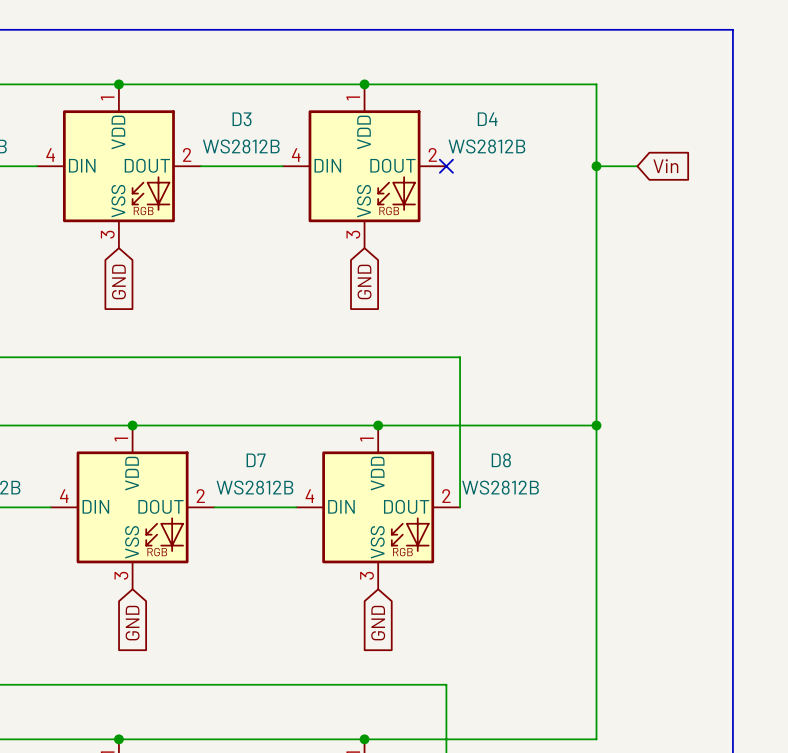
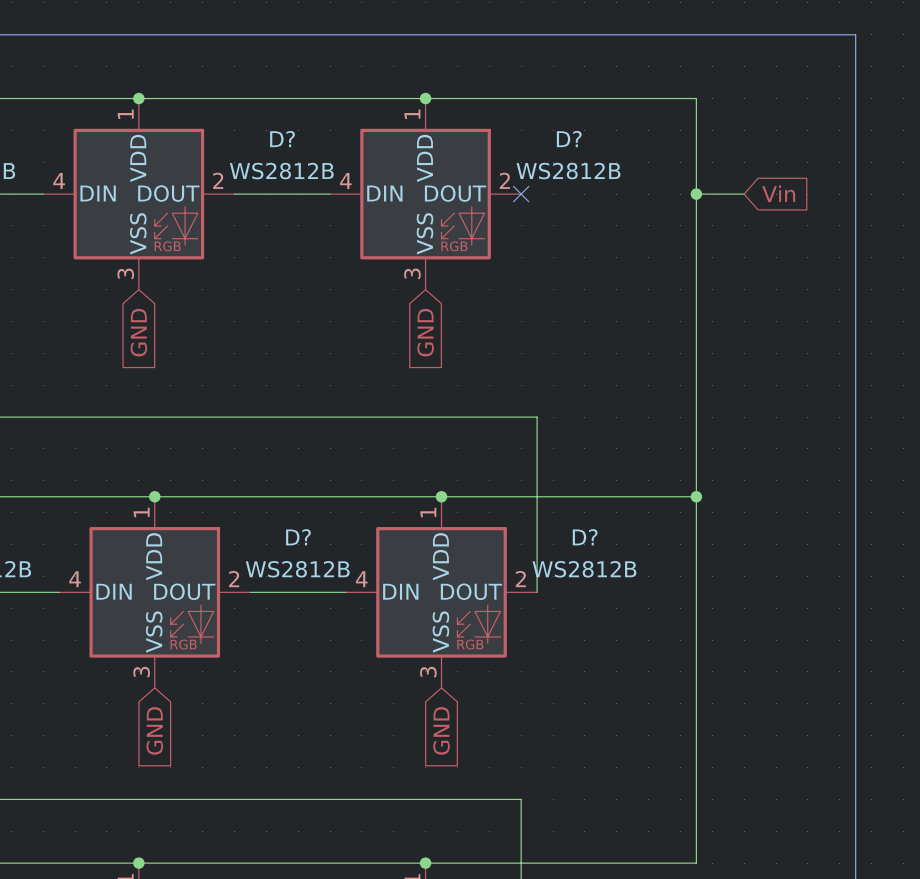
D3 name: D3 (242, 119) -> D? (282, 139)
D4 name: D4 (487, 119) -> D? (569, 139)
D7 name: D7 (256, 460) -> D? (298, 537)
D8 name: D8 (501, 460) -> D? (585, 537)

